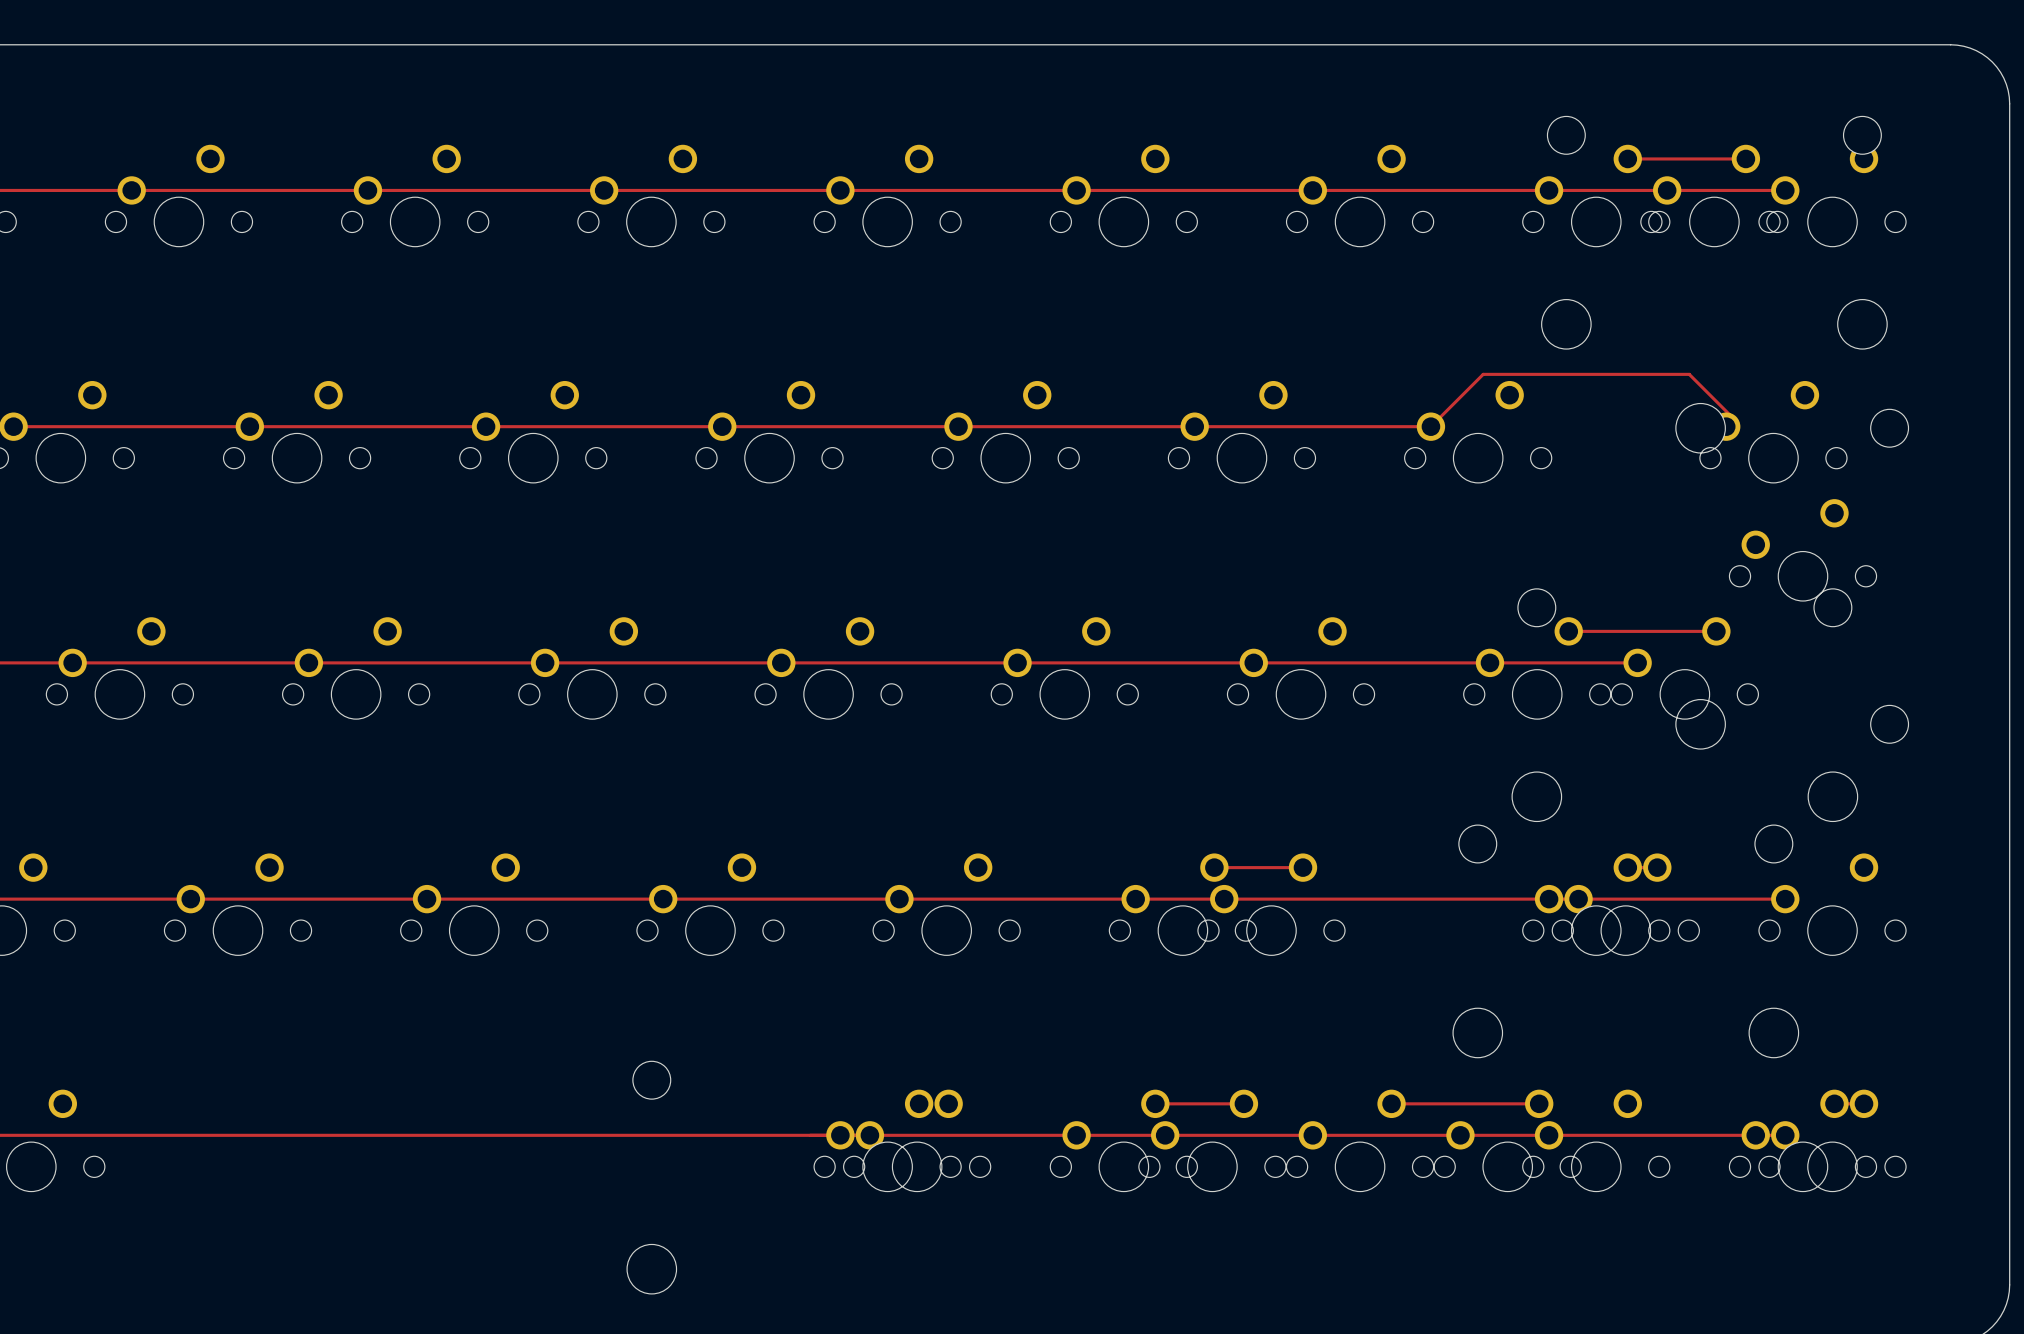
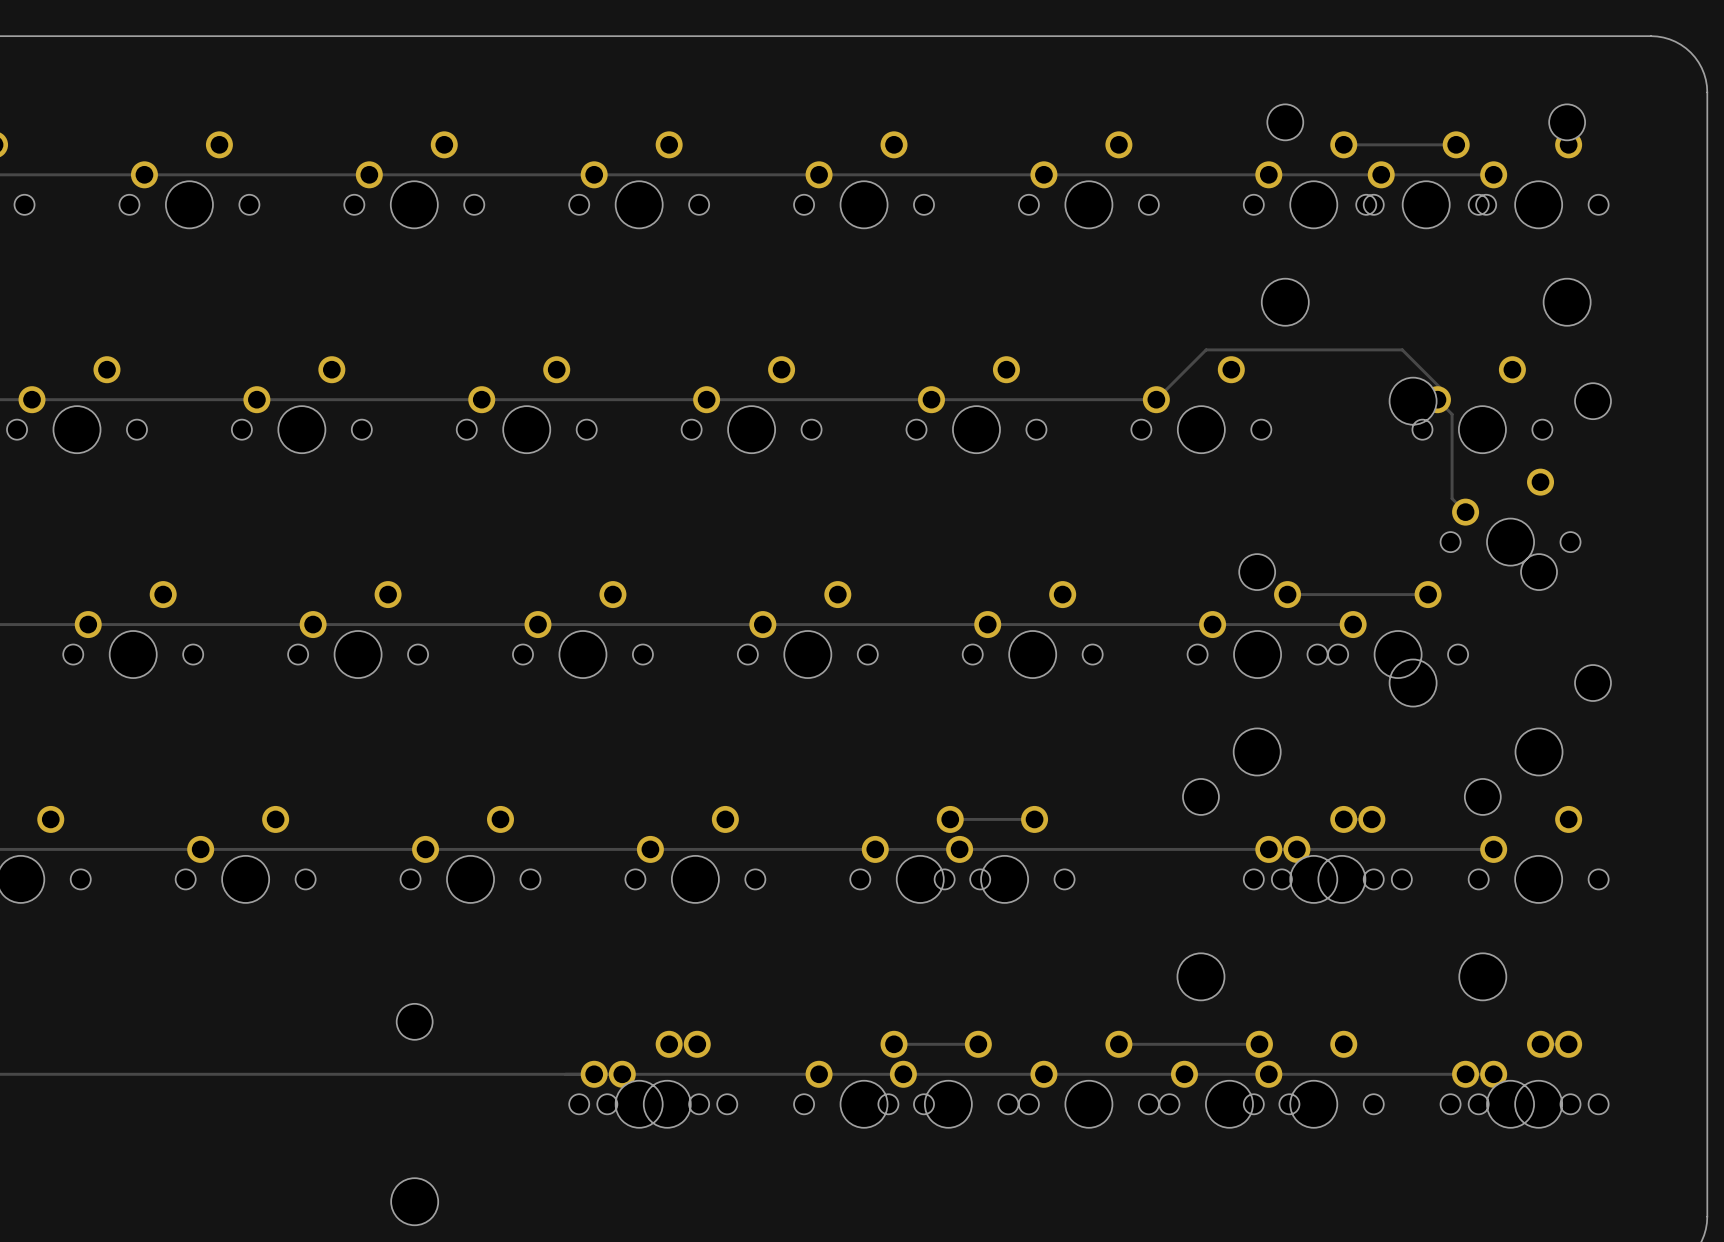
track: none -> (1440, 402) (1452, 414) (1452, 498) (1465, 512)

